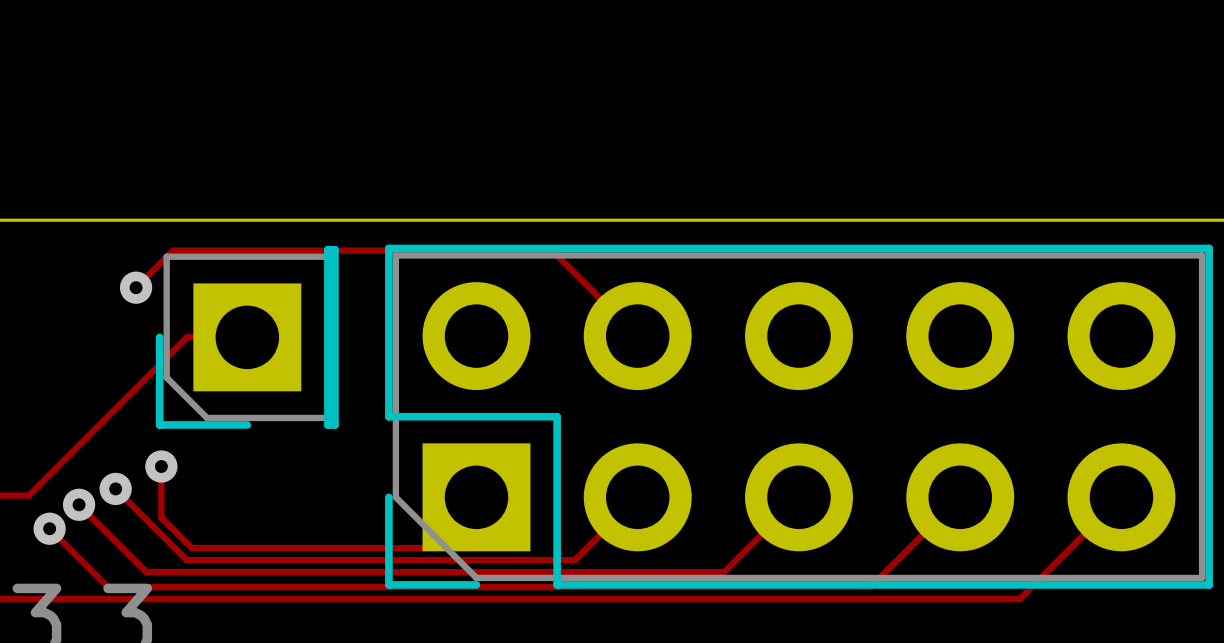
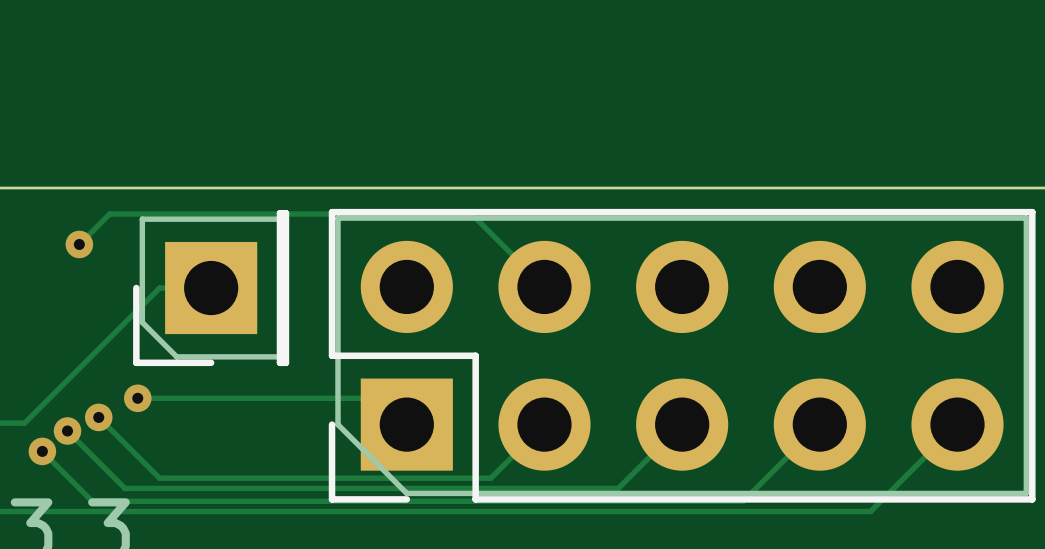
track: (173, 250) (136, 287) -> (147, 214) (109, 214) (79, 244)
via position: (136, 287) -> (79, 244)
track: (161, 466) (161, 517) (191, 548) (425, 548) (476, 497) -> (137, 398) (380, 398) (406, 424)

